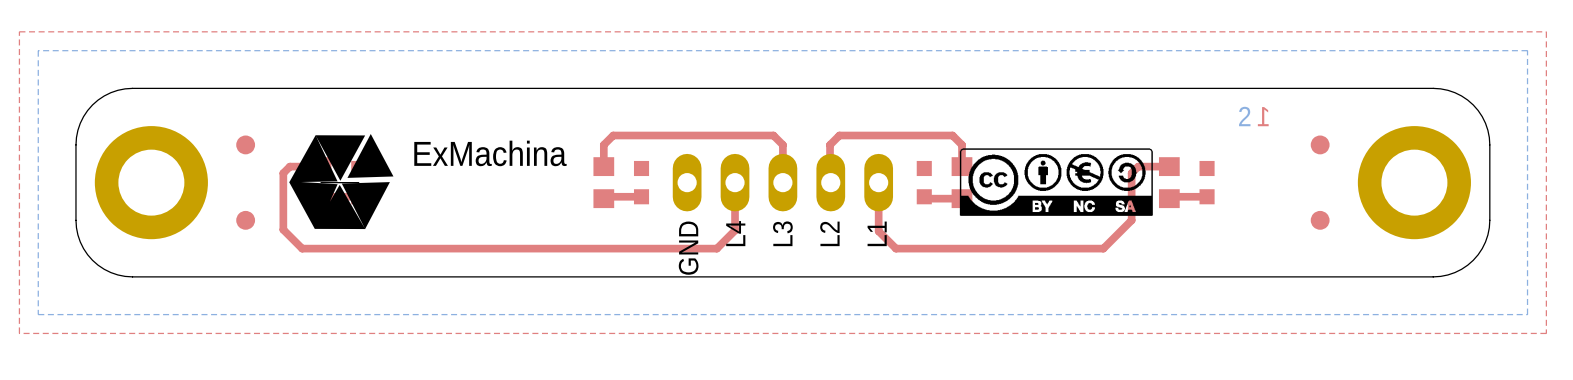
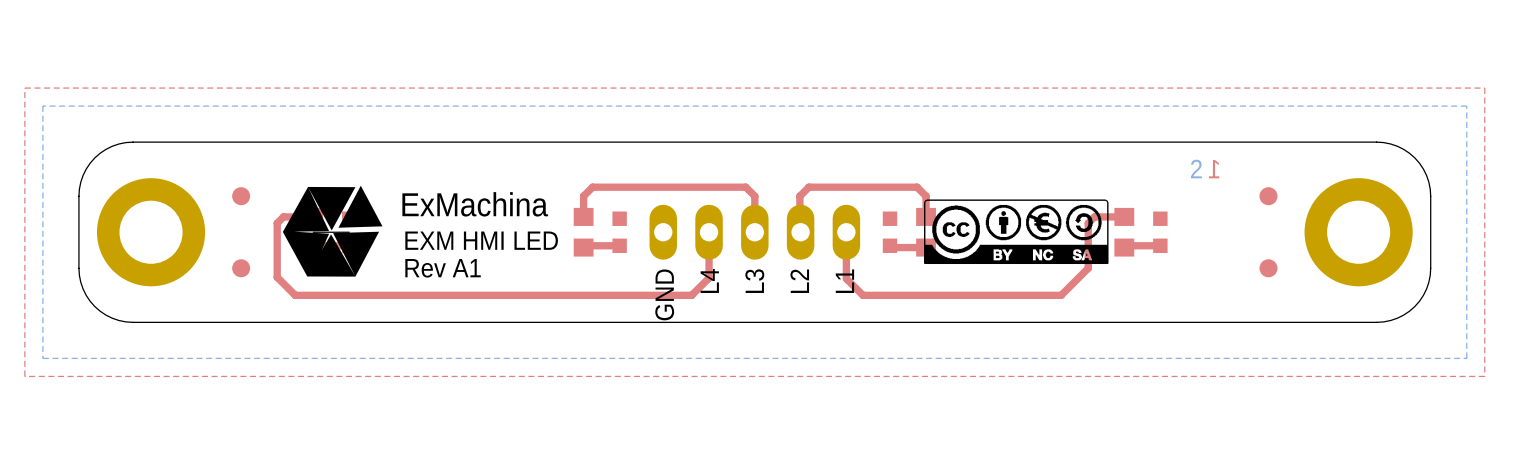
text: none -> EXM HMI LED (481, 240)
text: none -> Rev A1 (443, 268)

